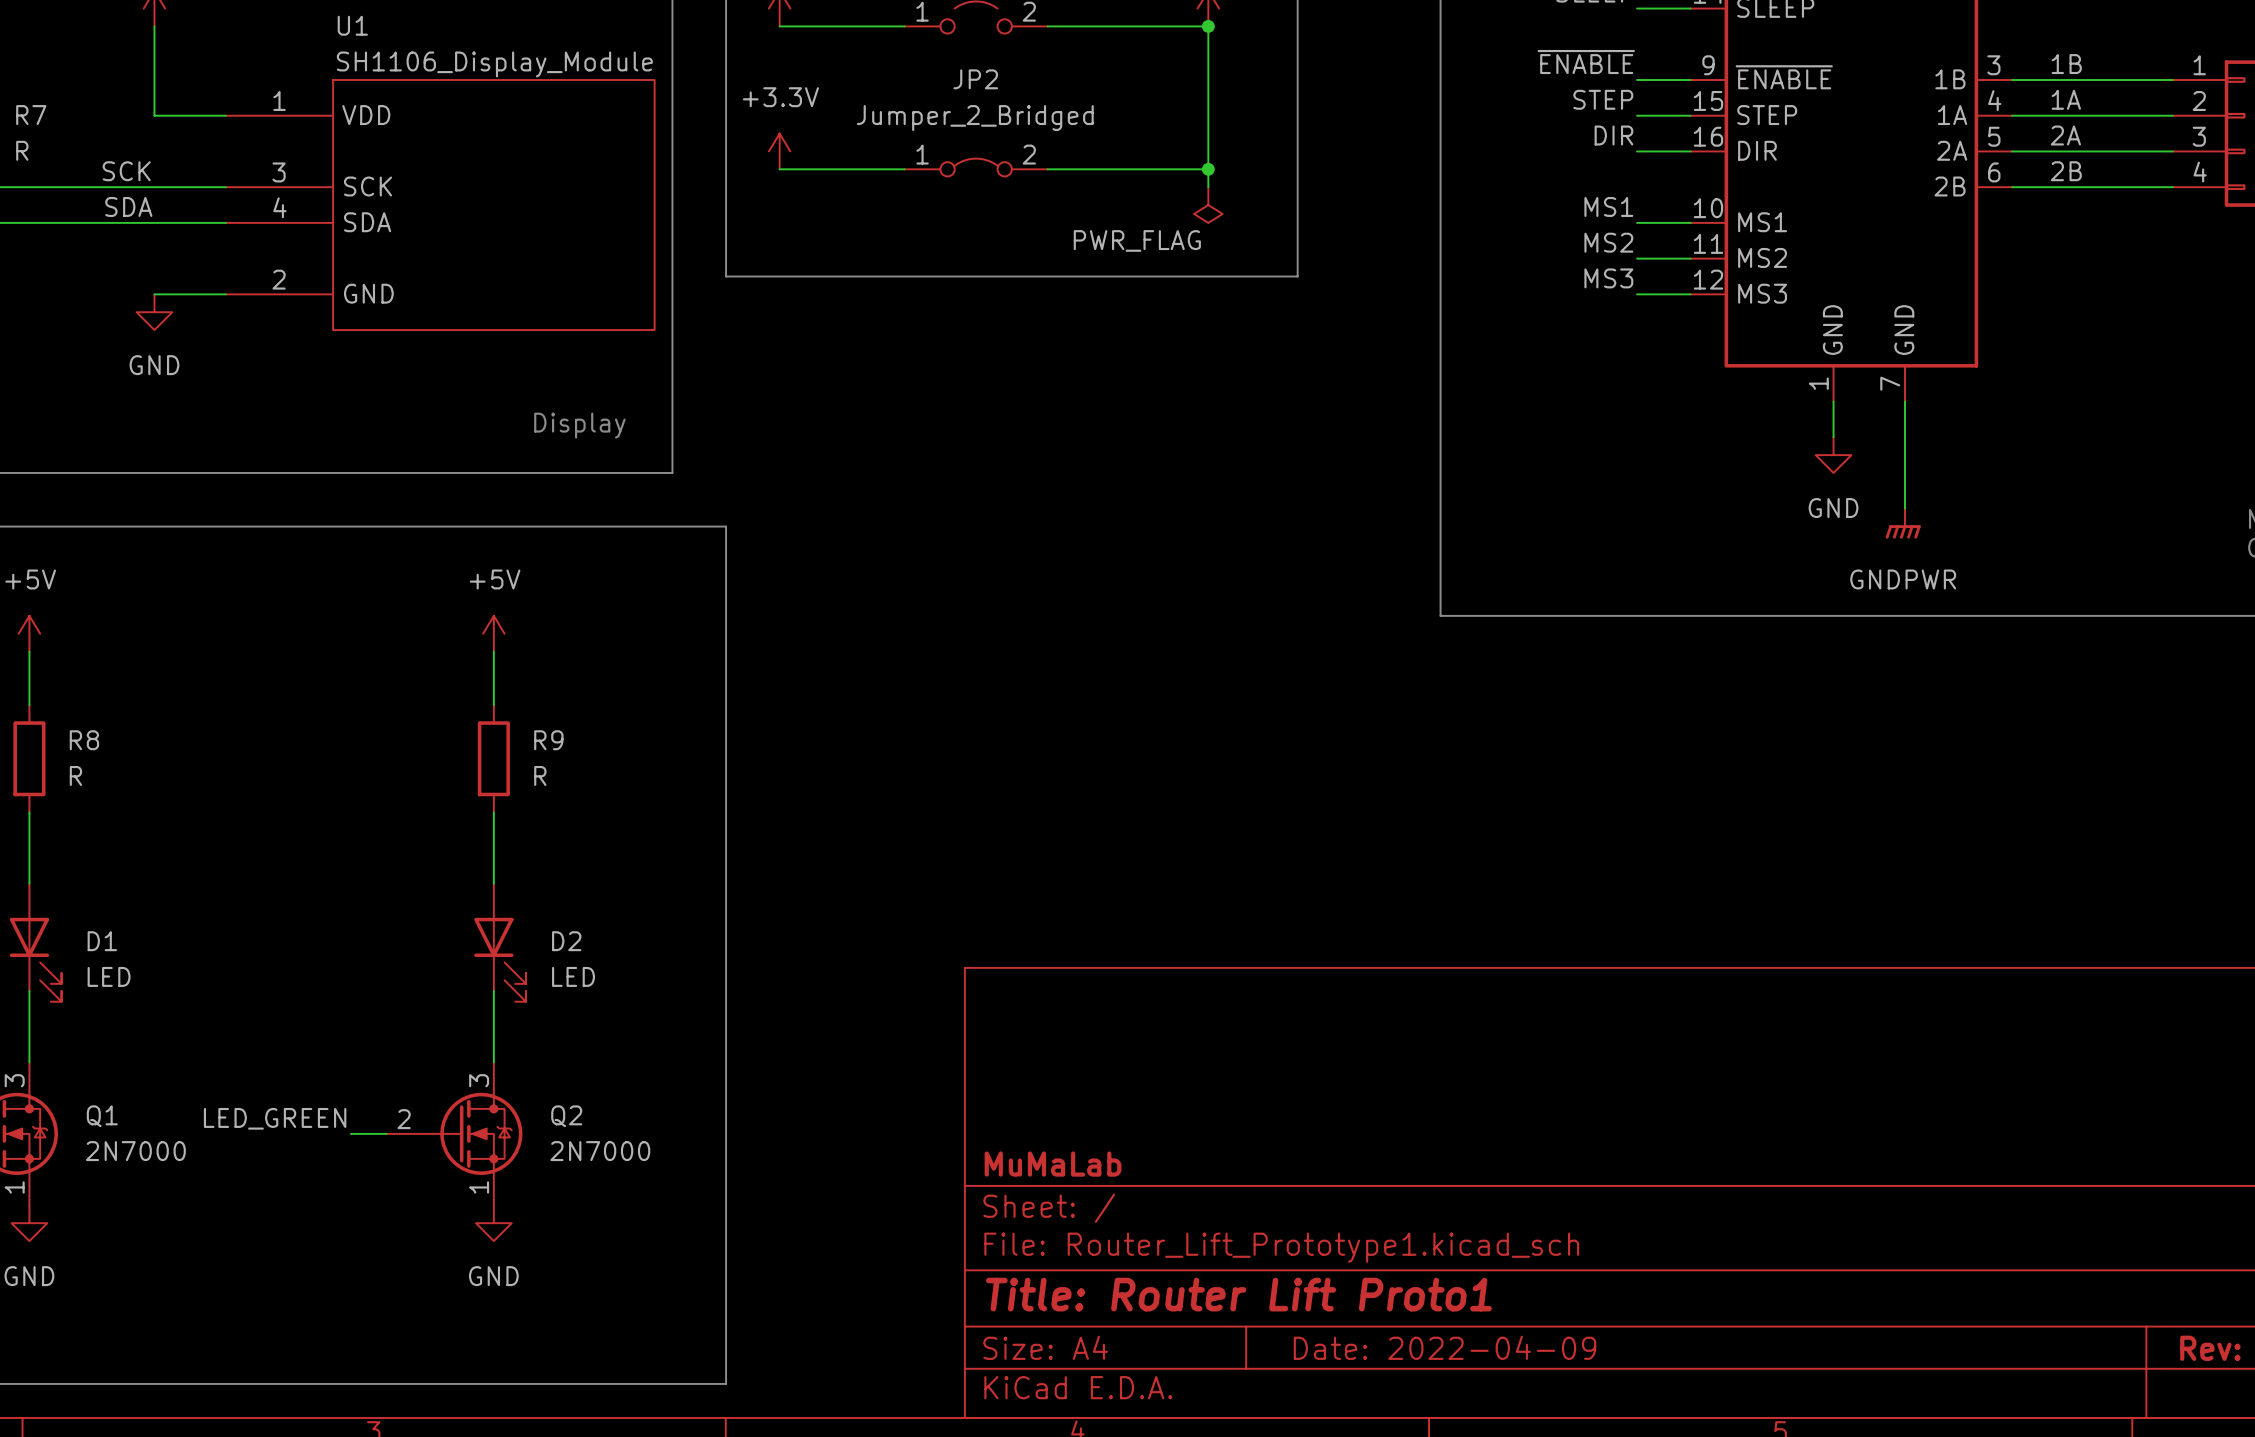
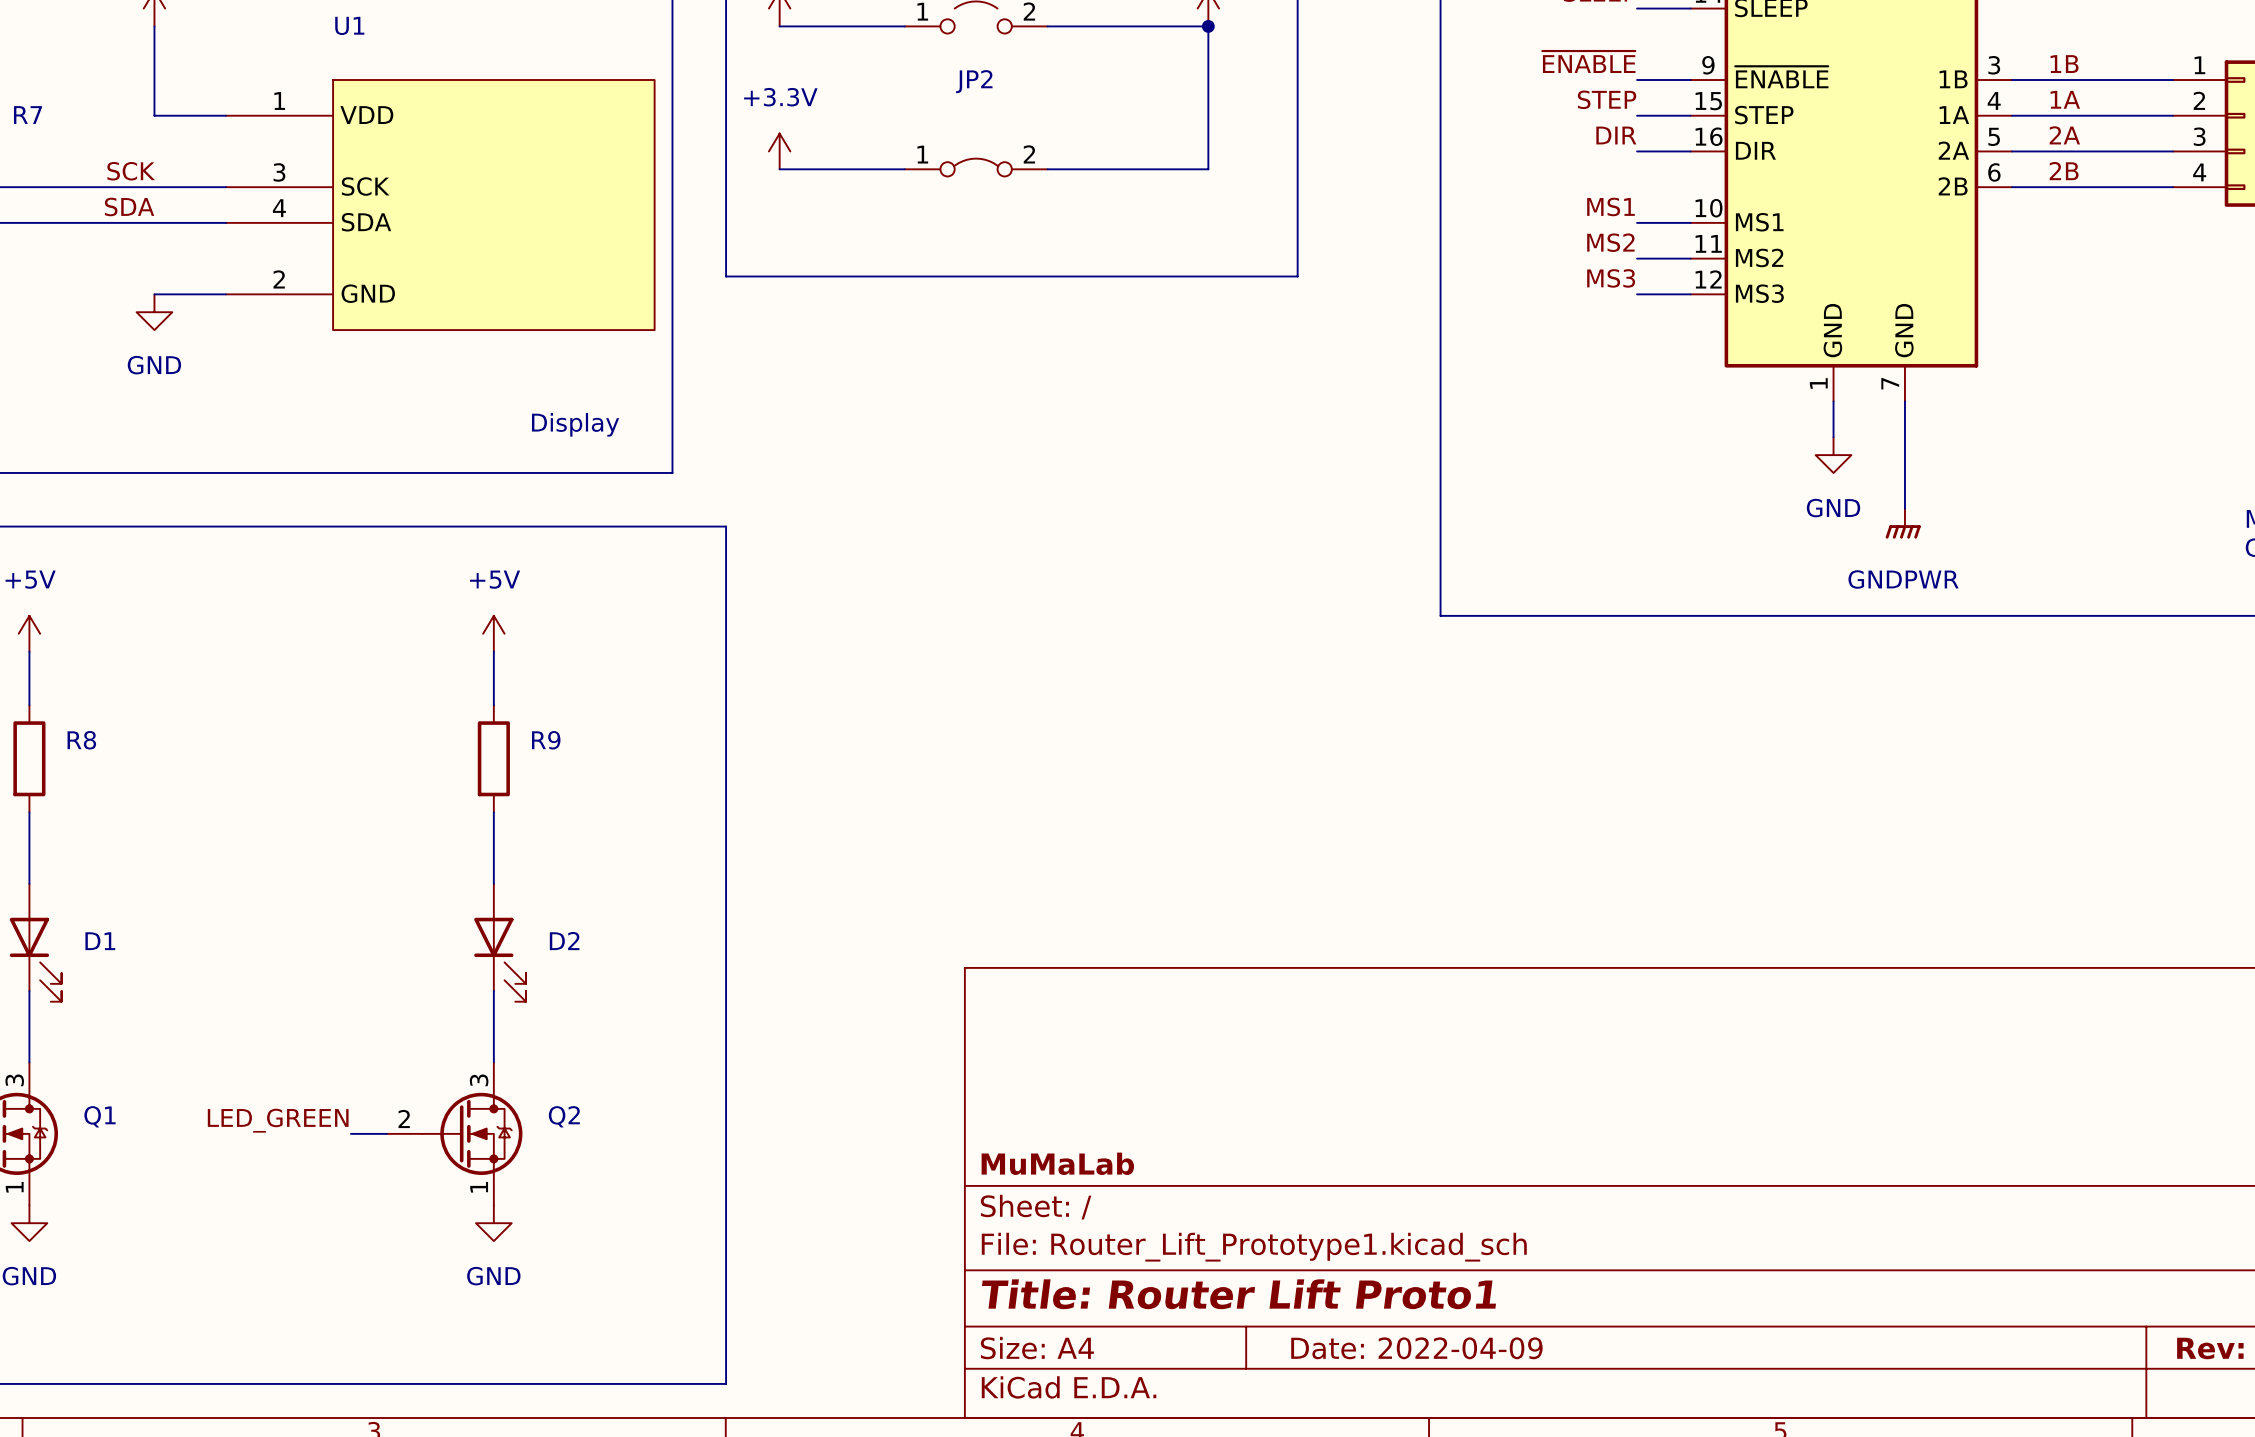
U1 value: SH1106_Display_Module (494, 64) -> none
JP2 value: Jumper_2_Bridged (975, 118) -> none
R7 value: R (22, 150) -> none
wire: (1208, 169) (1208, 187) -> none
junction: (1208, 169) -> none
power symbol: PWR_FLAG (1208, 205) -> none
R8 value: R (75, 775) -> none
R9 value: R (540, 775) -> none
D1 value: LED (109, 976) -> none
D2 value: LED (573, 976) -> none
Q1 value: 2N7000 (135, 1151) -> none
Q2 value: 2N7000 (600, 1151) -> none

